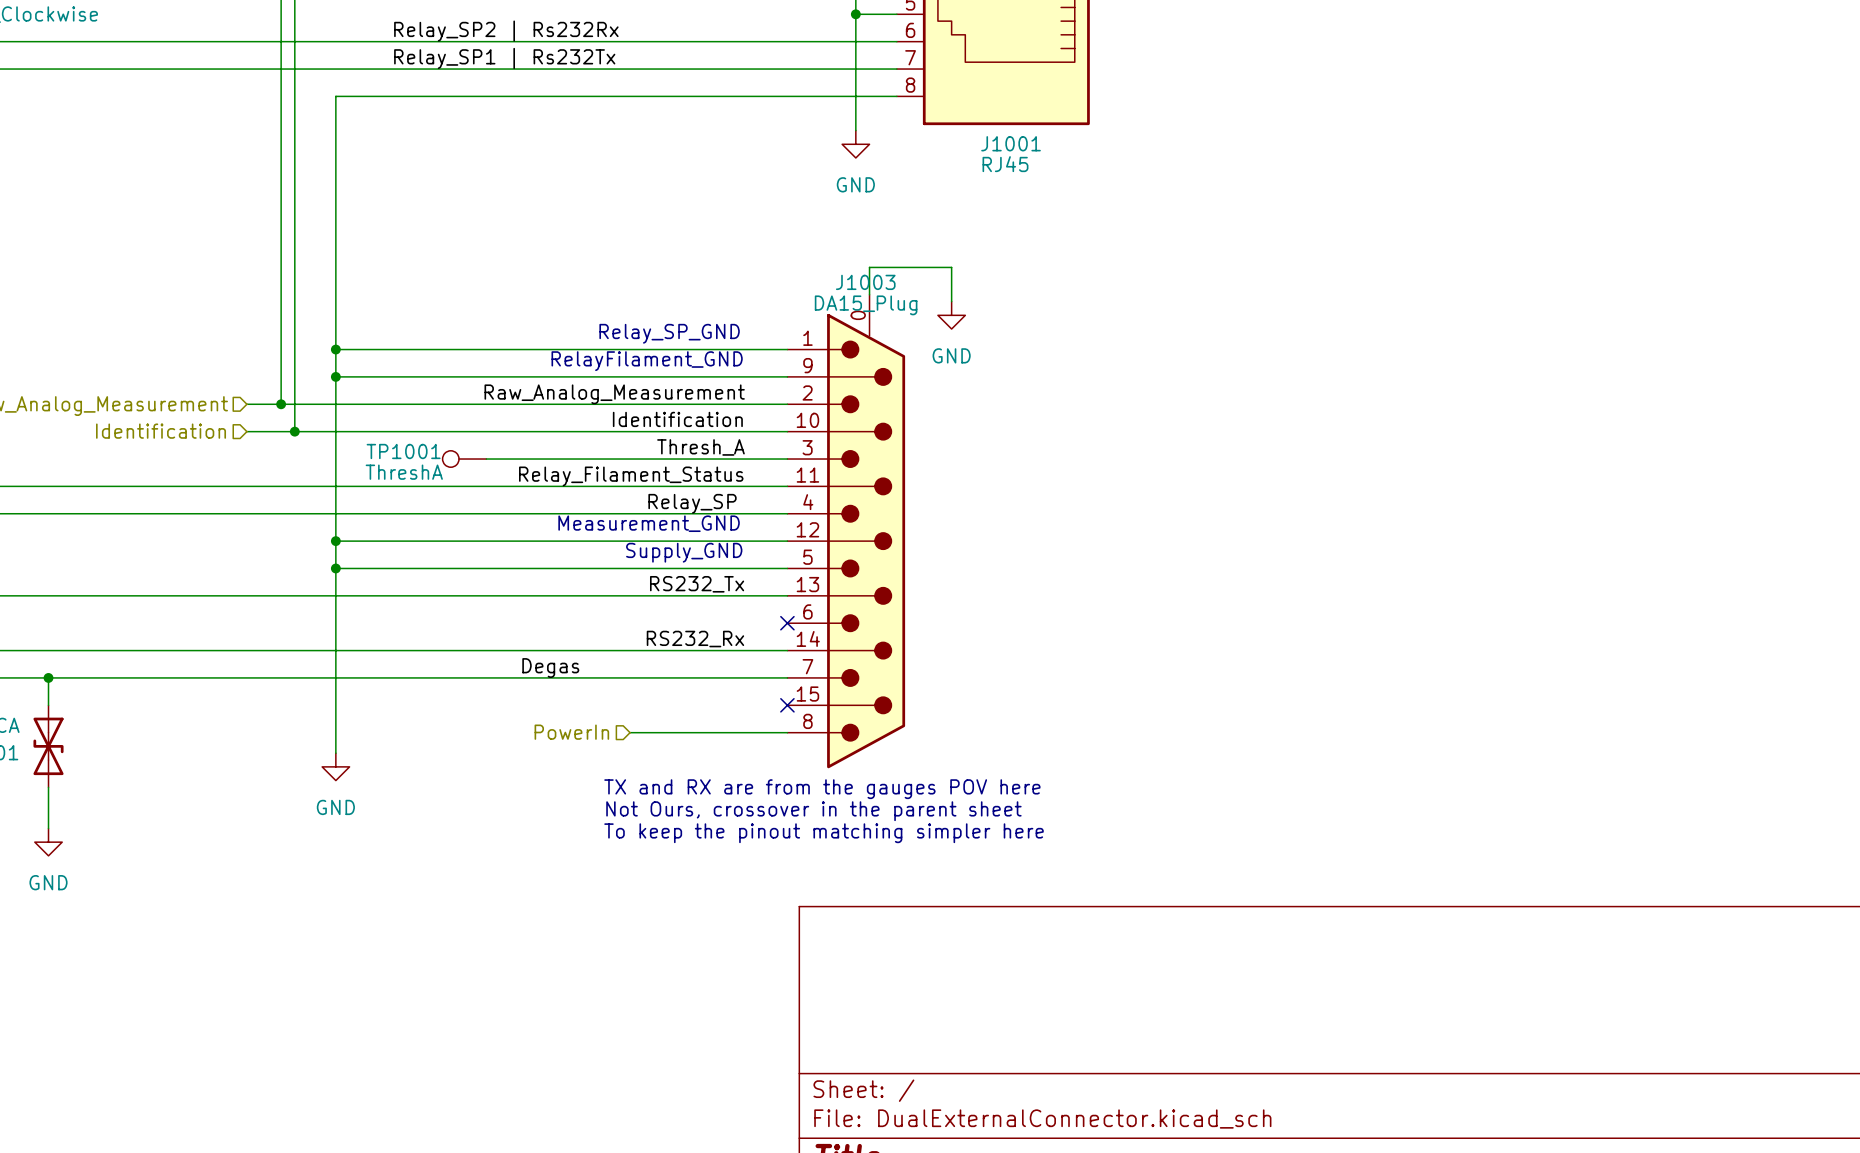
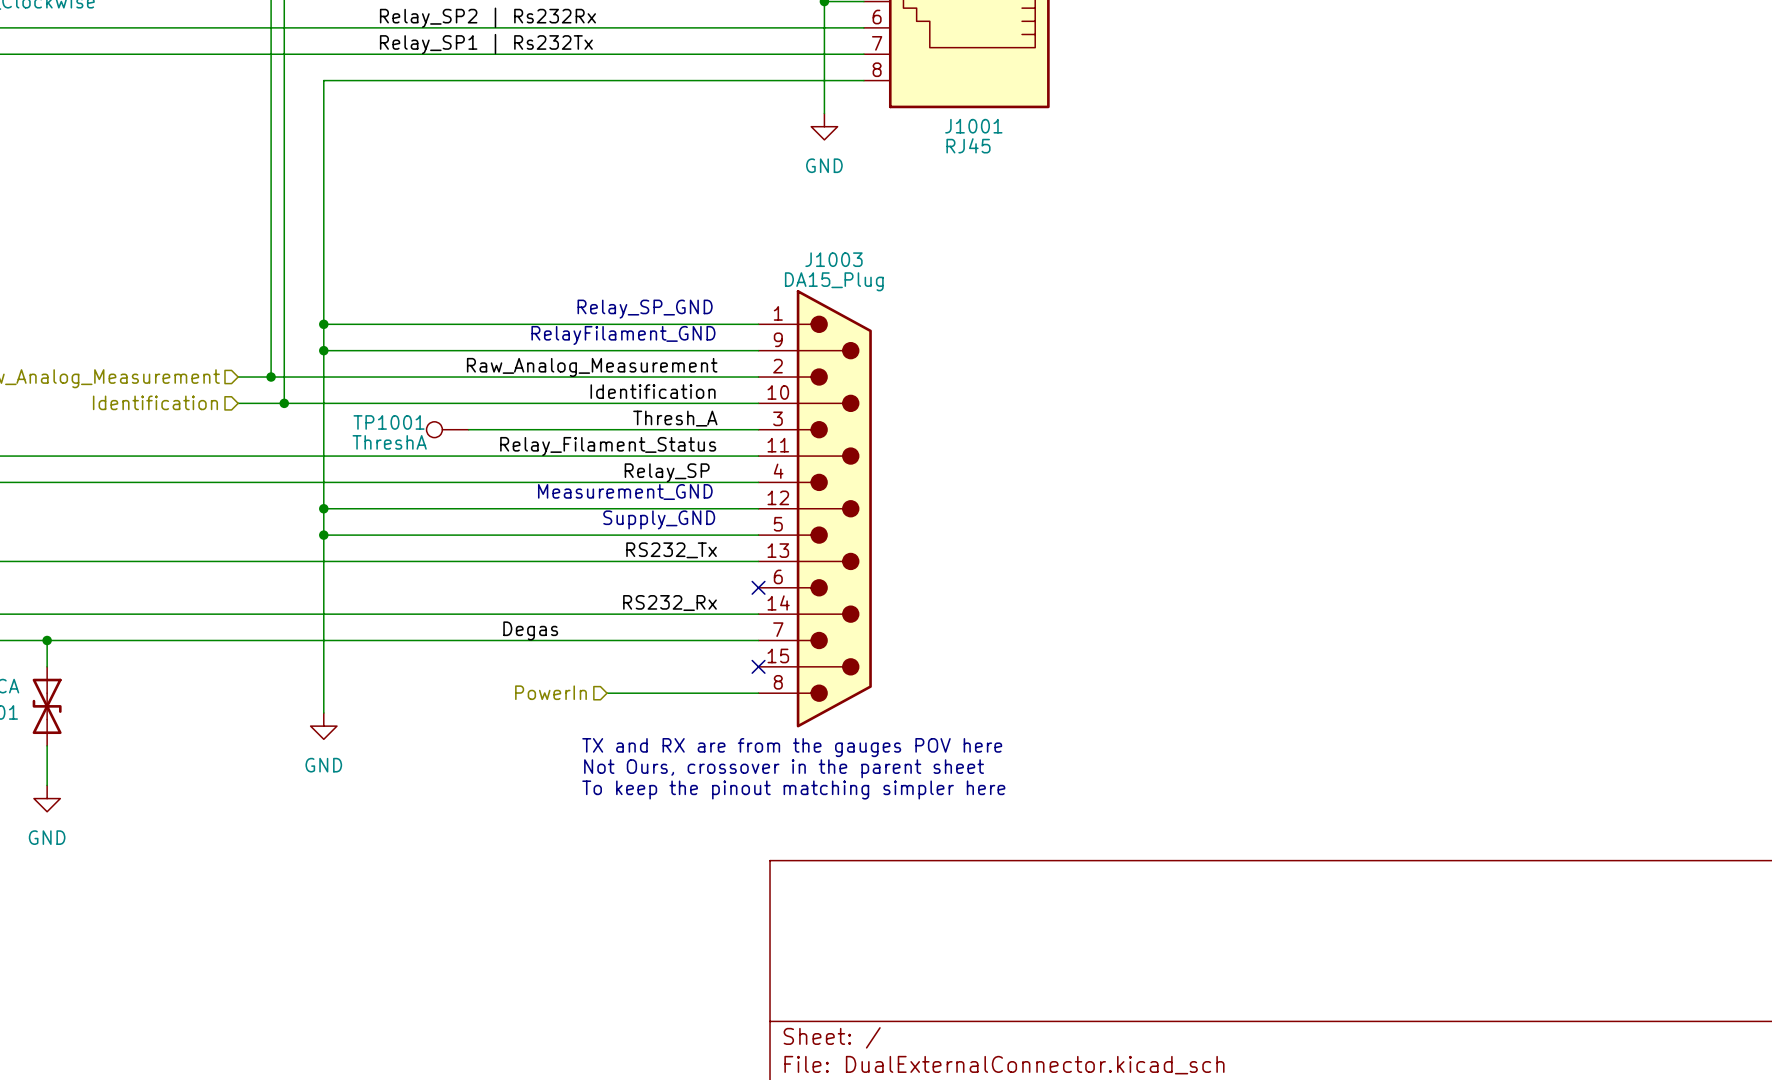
J1003 symbol: [787, 294, 906, 769] -> [758, 290, 872, 728]
wire: (869, 294) (869, 267) (951, 267) (951, 301) -> none
power symbol: GND (951, 315) -> none

